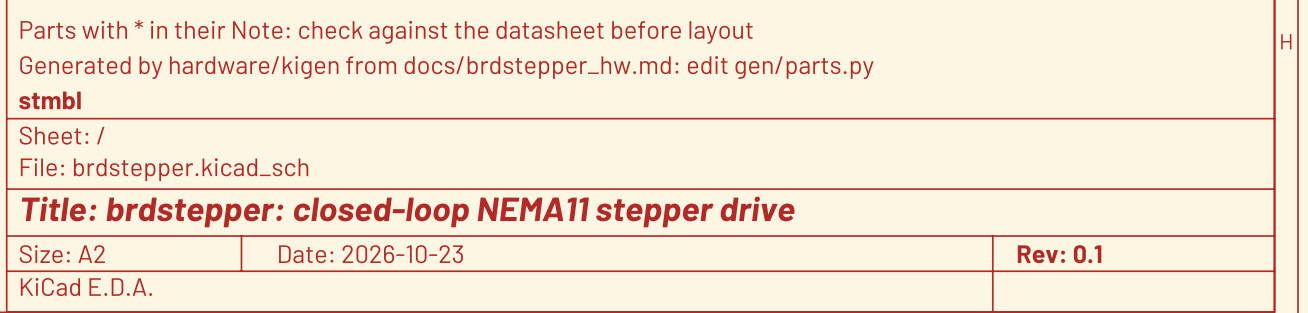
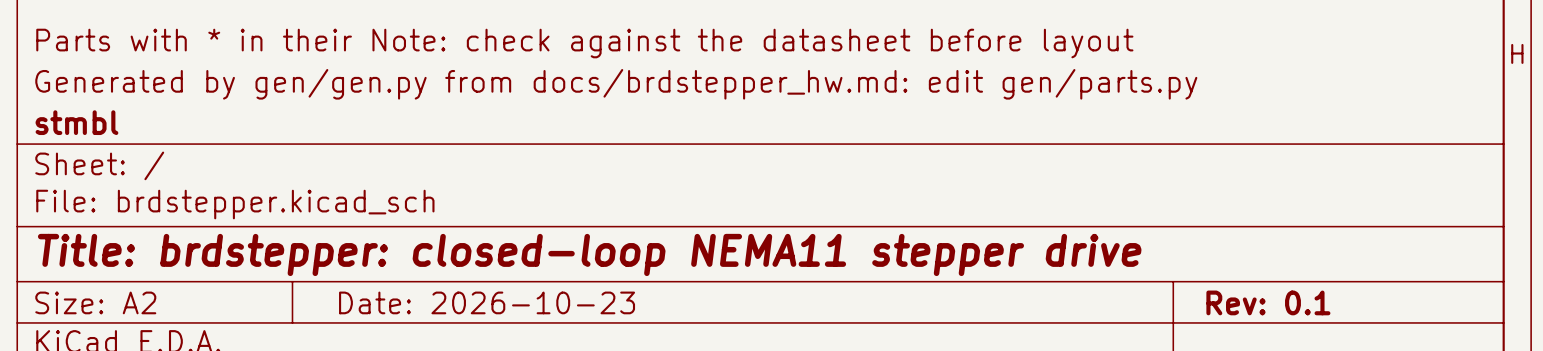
title block: Generated by hardware/kigen from docs/brdstepper_hw.md: edit gen/parts.py (446, 67) -> Generated by gen/gen.py from docs/brdstepper_hw.md: edit gen/parts.py (616, 84)

